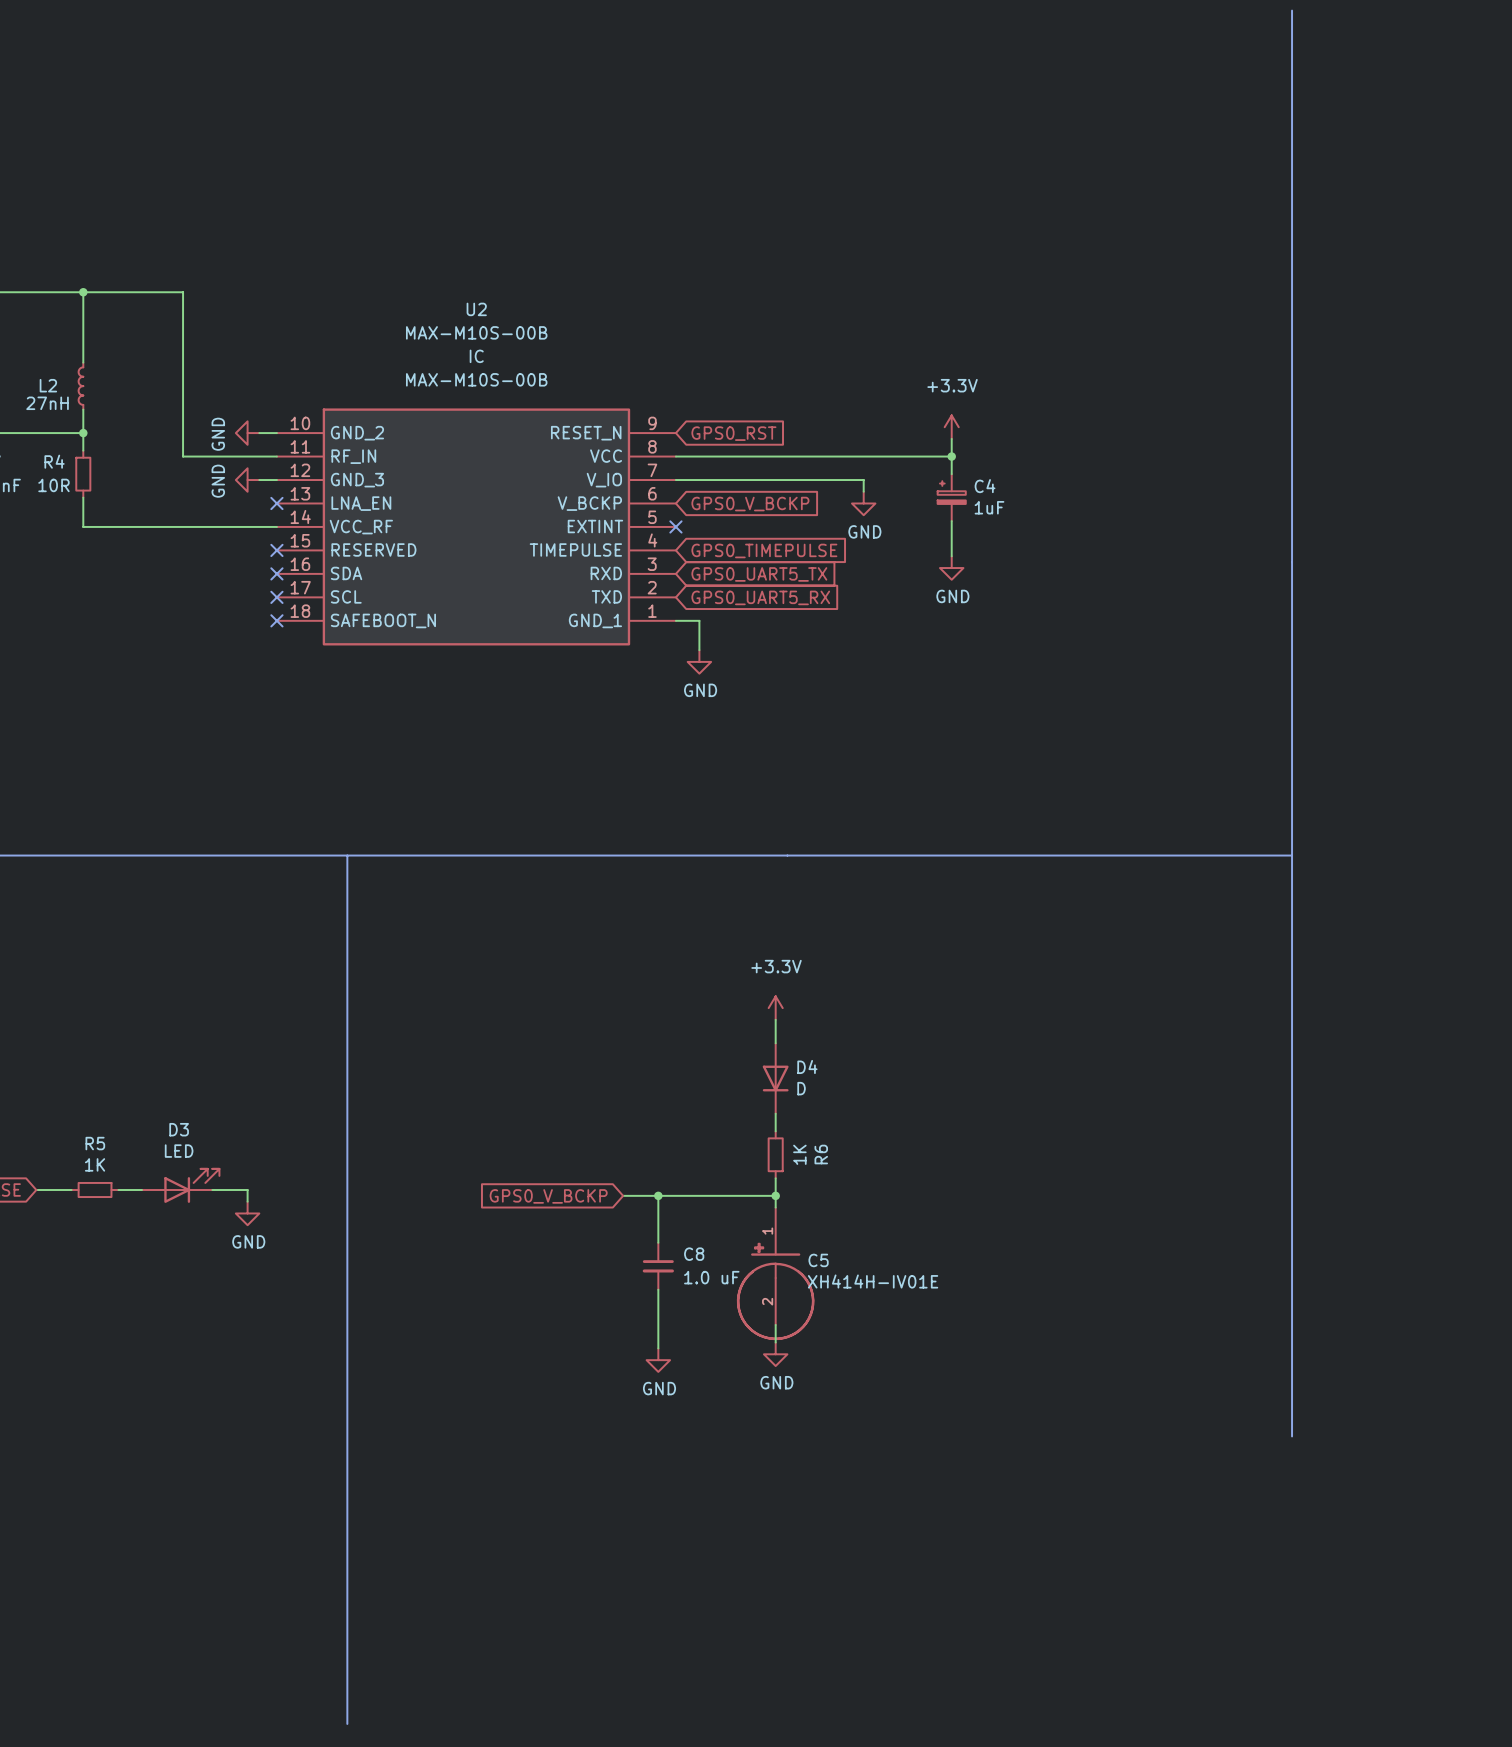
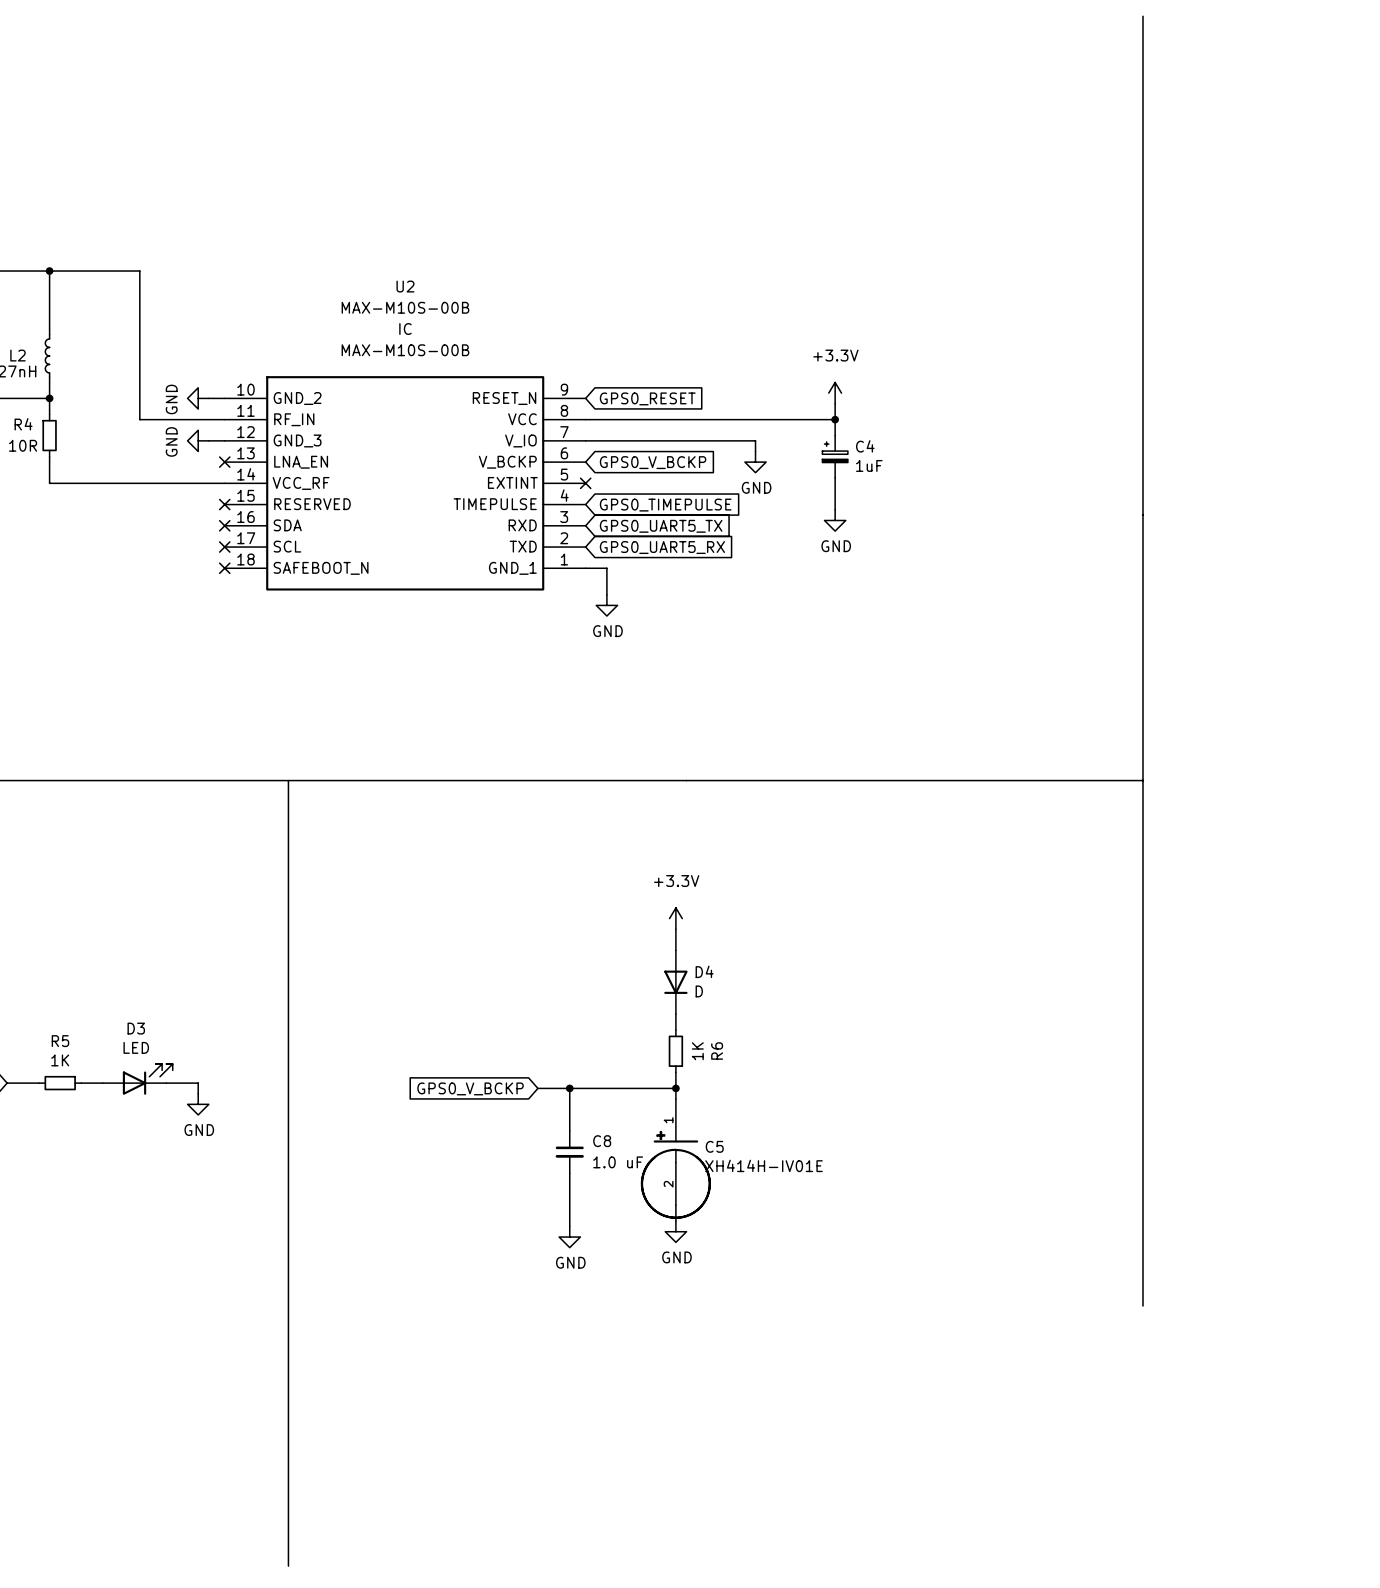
global label: GPS0_RST (733, 433) -> GPS0_RESET (647, 398)

